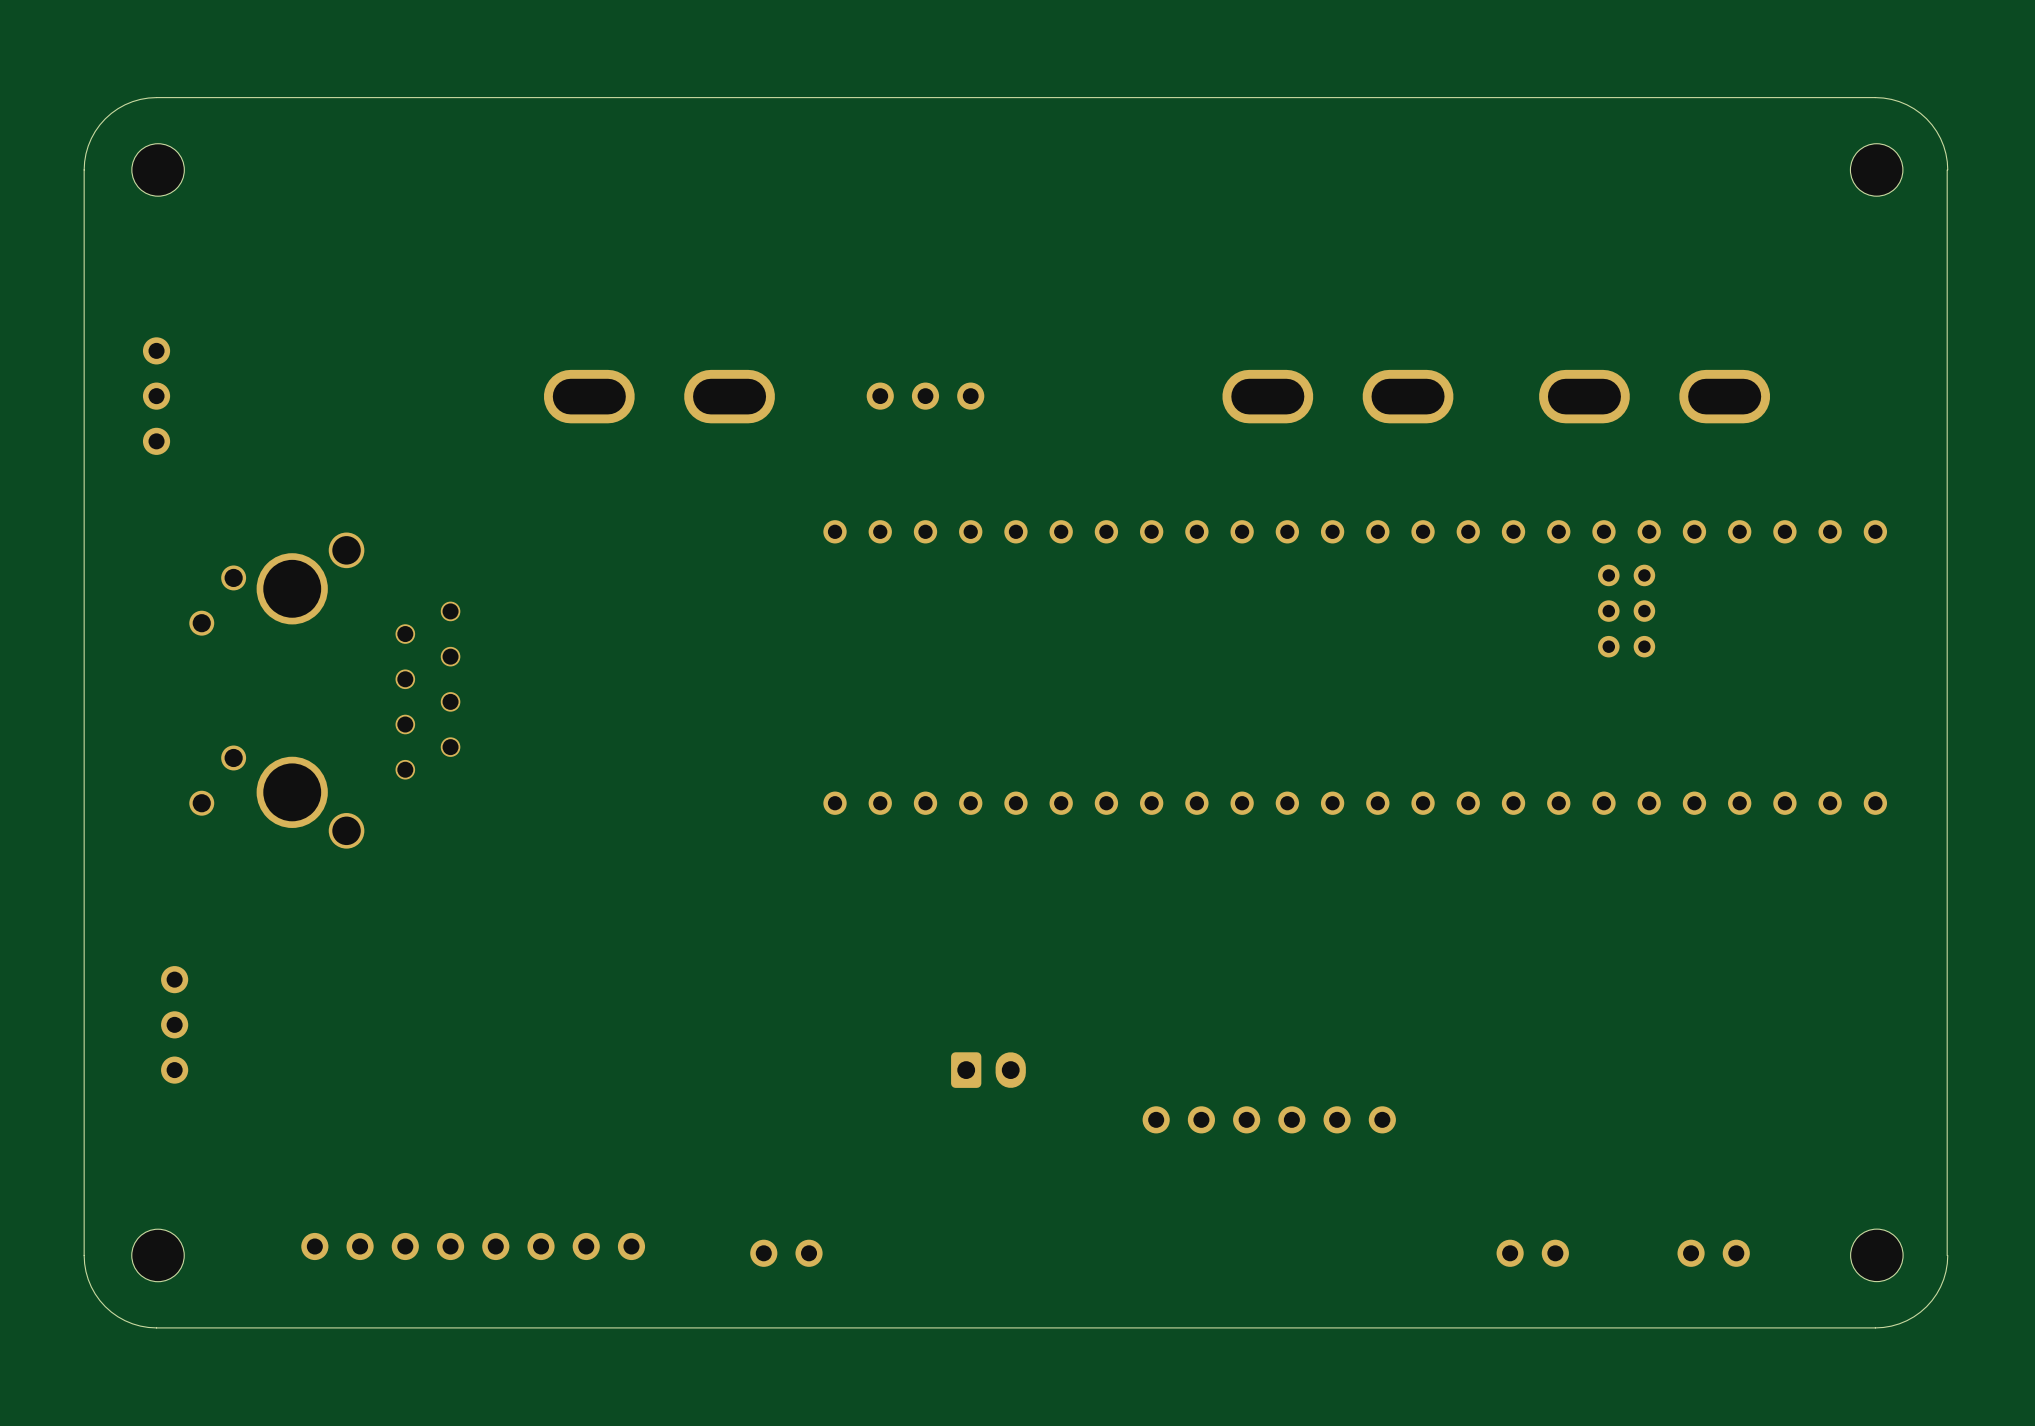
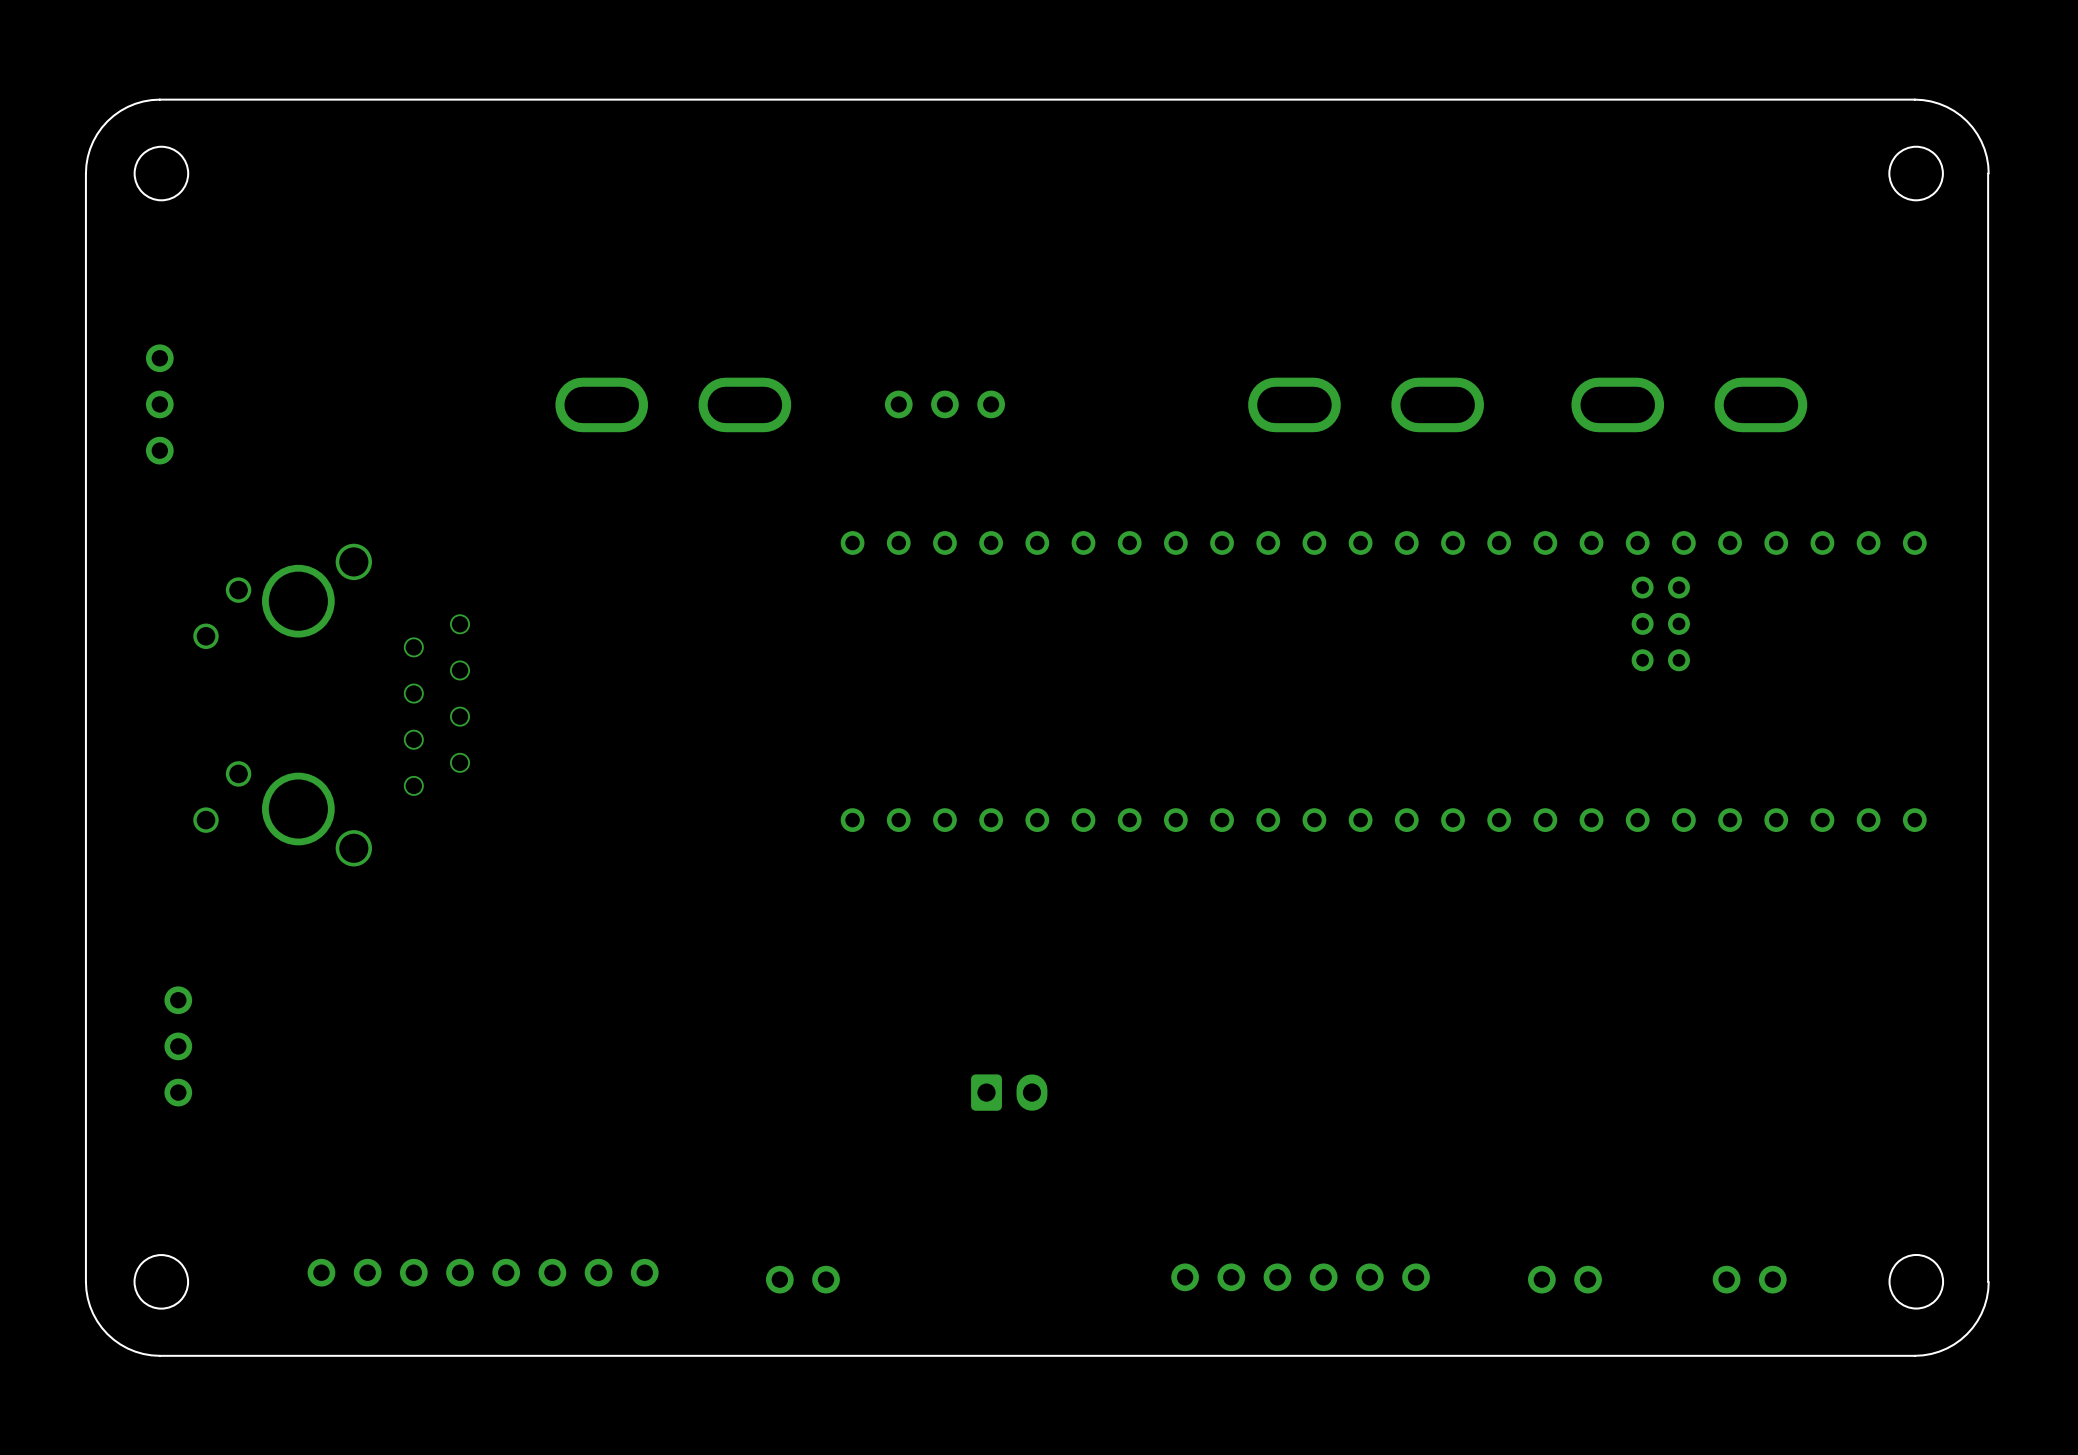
part position: (1269, 1119) -> (1300, 1277)

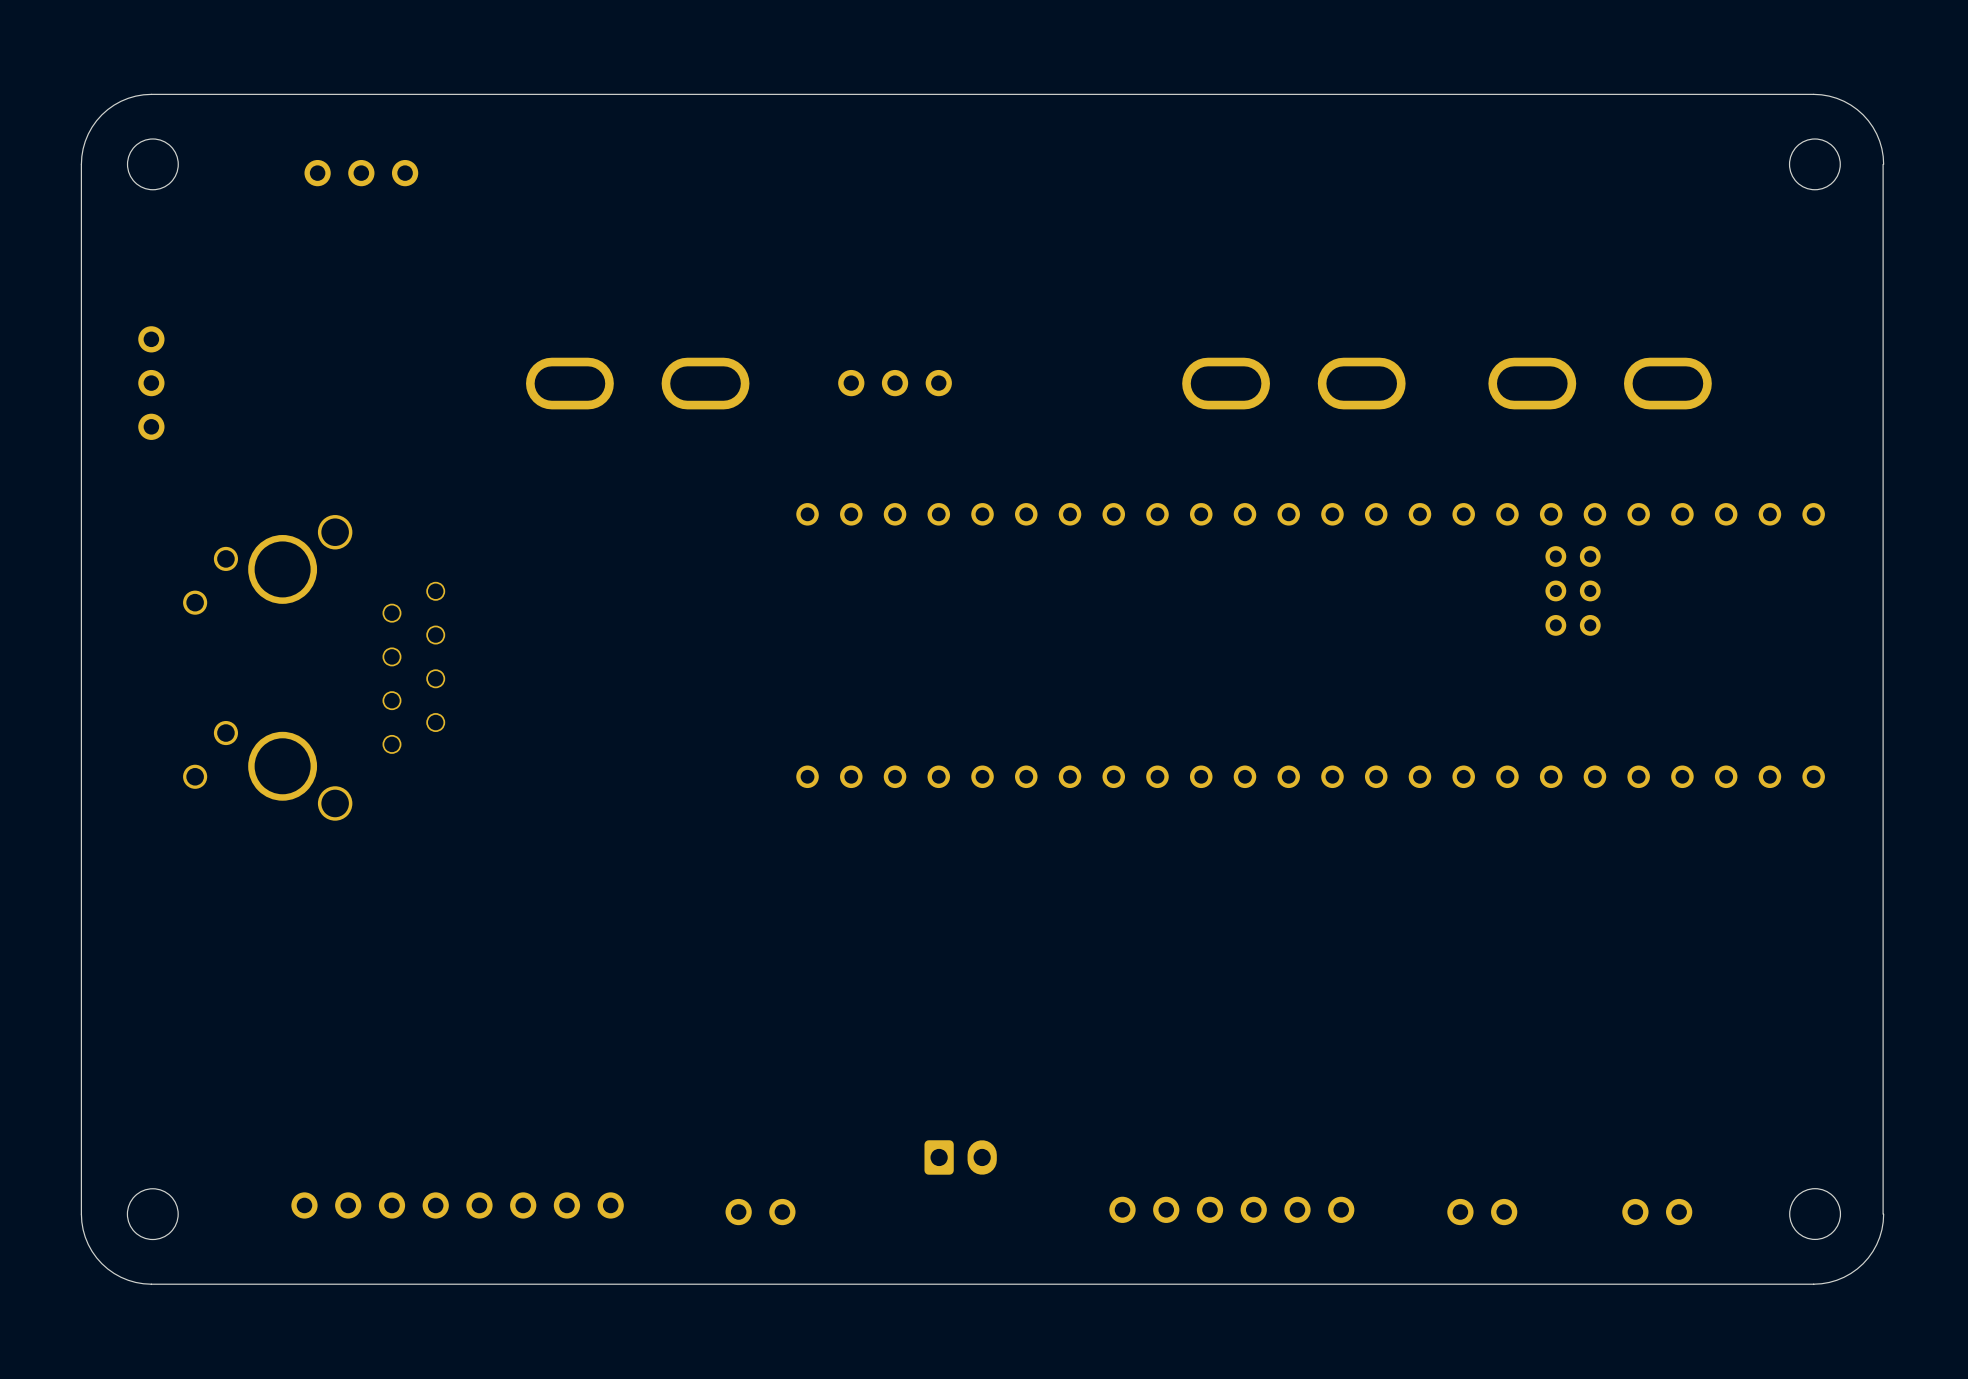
part: none -> (361, 173)
part: (178, 1046) -> none
part position: (1009, 1092) -> (960, 1157)

